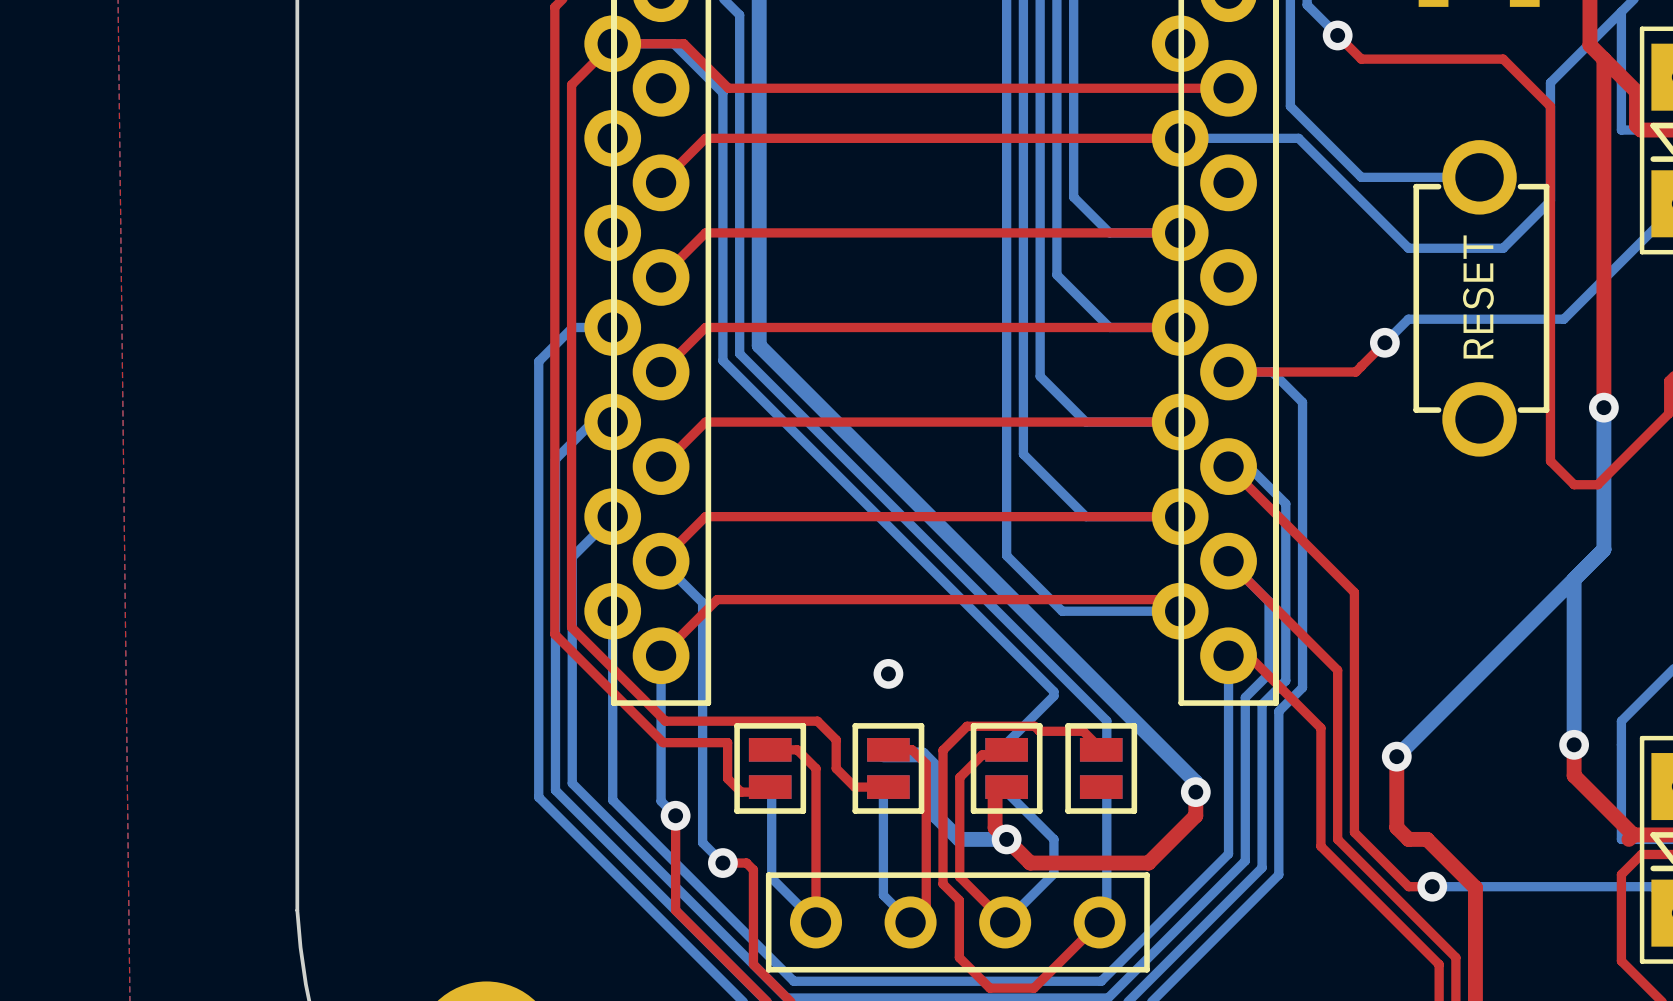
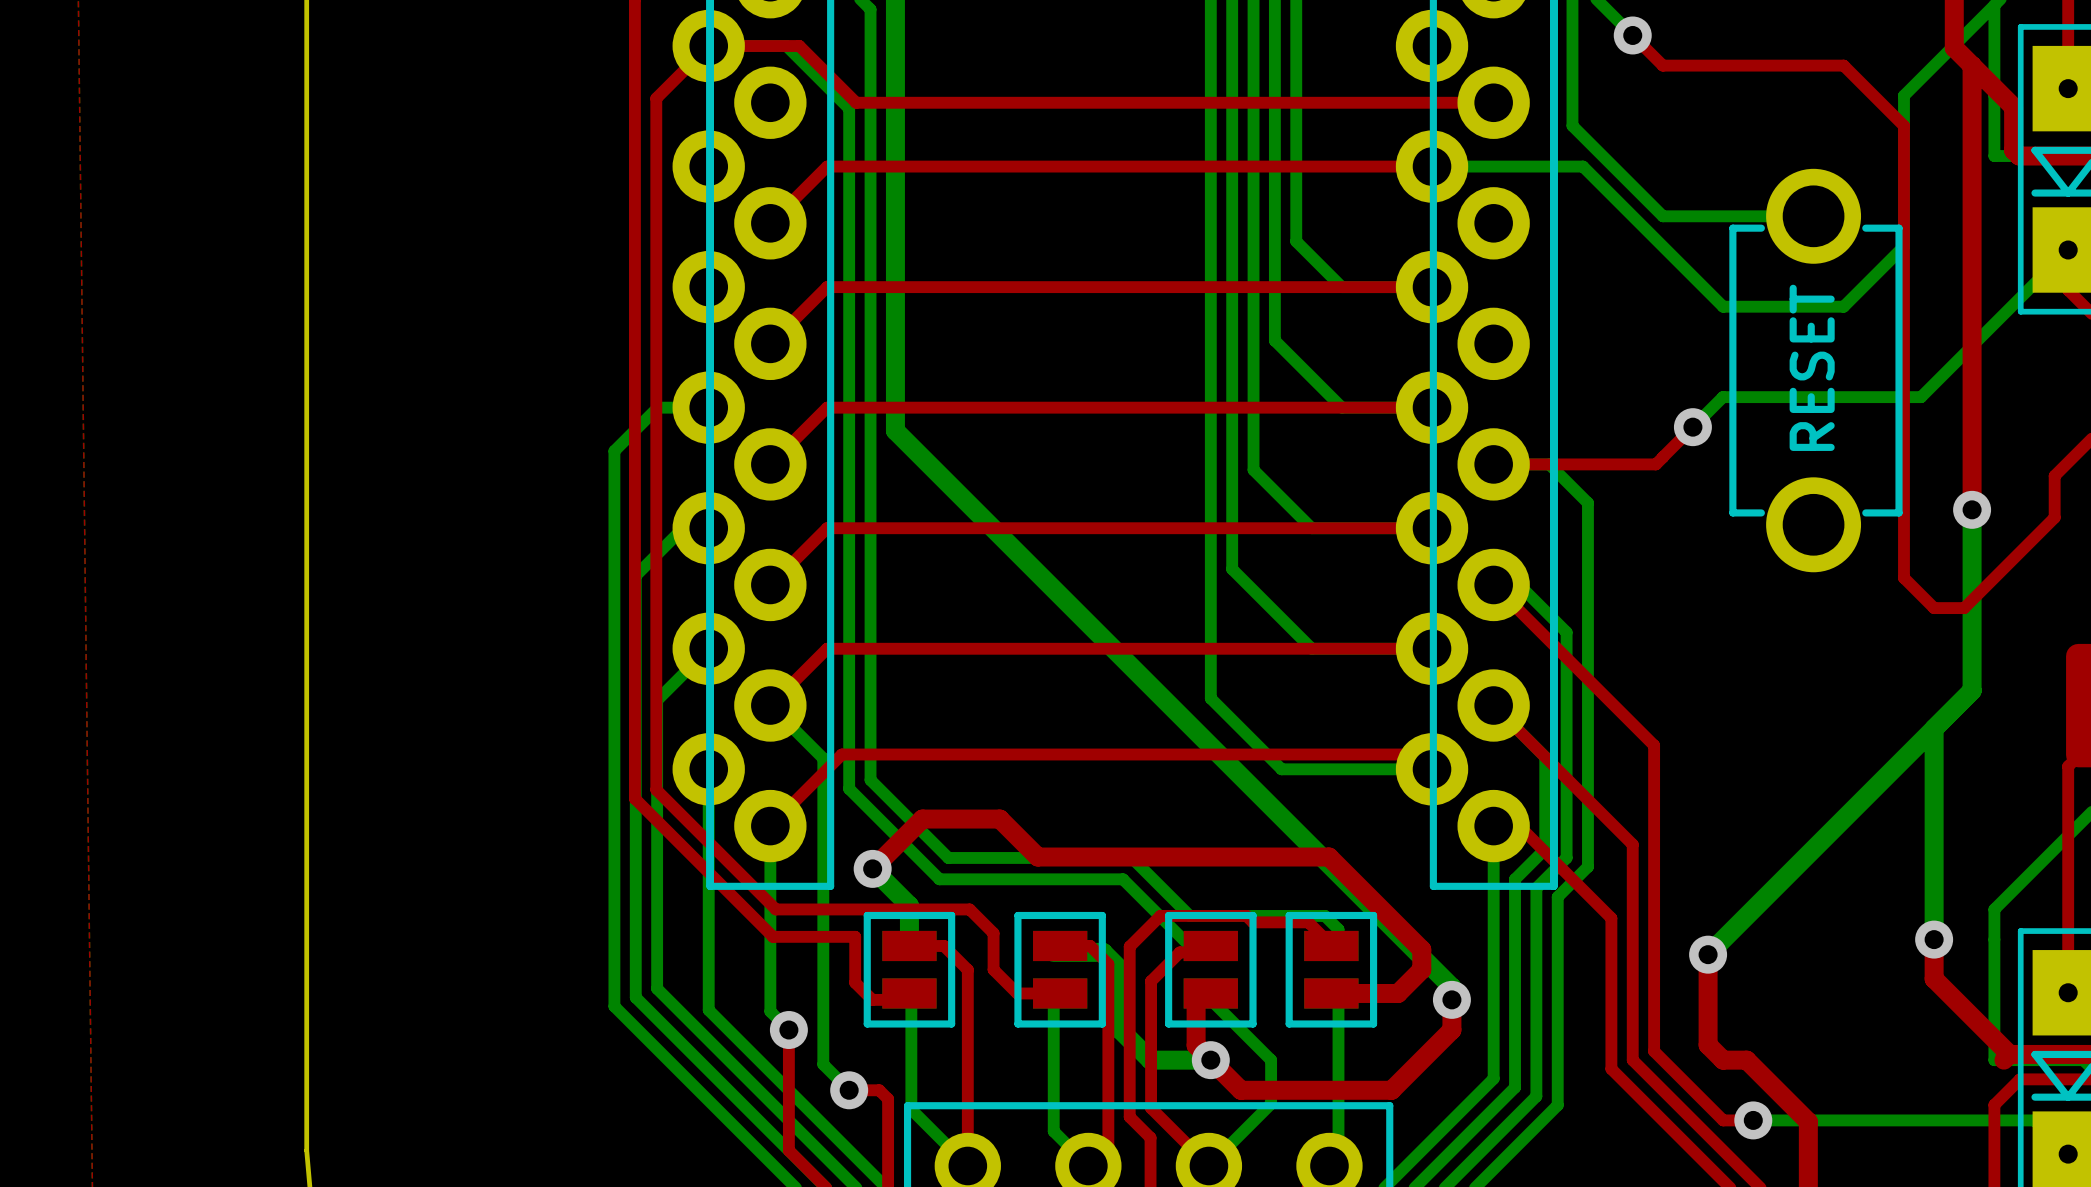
bottom track: (739, 353) (1106, 720) (1106, 736) -> (870, 441) (870, 780) (948, 857) (1131, 857) (1189, 915) (1324, 915) (1338, 929)
bottom track: (722, 360) (1053, 691) (1053, 696) (995, 754) -> (849, 449) (849, 788) (939, 879) (1123, 879) (1196, 952)
via position: (888, 673) -> (872, 868)
top track: none -> (872, 868) (922, 819) (999, 819) (1037, 857) (1329, 857) (1421, 949) (1421, 969) (1398, 993) (1331, 993)
bottom track: none -> (872, 868) (909, 905) (909, 945)

